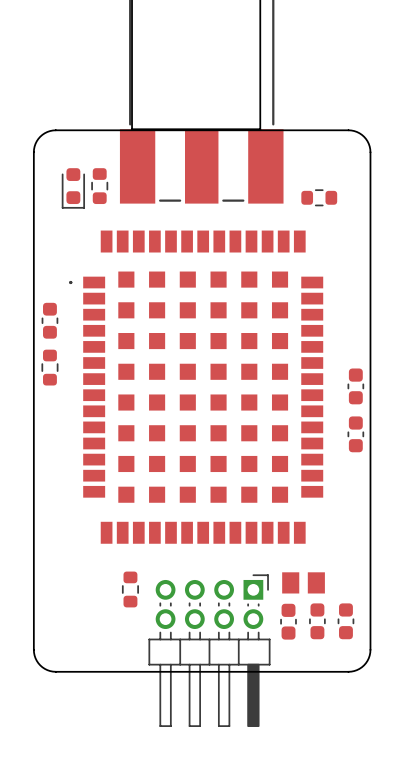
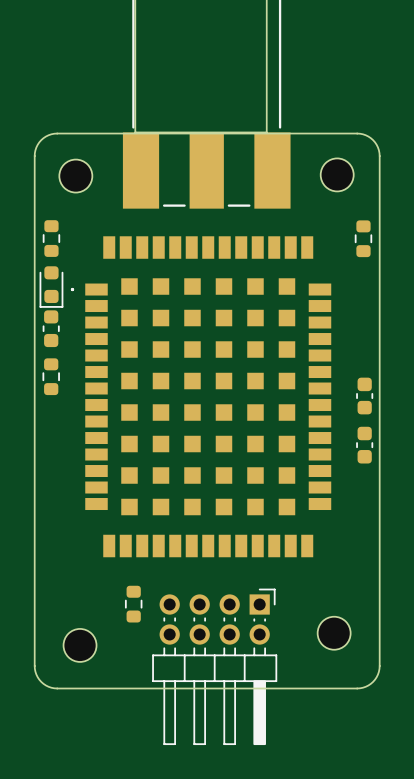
part: none -> (337, 174)
part: none -> (75, 176)
part position: (99, 186) -> (51, 238)
part position: (73, 188) -> (51, 287)
part rotation: 0° (319, 197) -> 90° clockwise (363, 238)
part position: (319, 197) -> (363, 238)
part: (303, 582) -> none
part footprint: [309, 603, 326, 640] -> [317, 616, 351, 650]
part: (288, 621) -> none
part: (345, 621) -> none
part: none -> (80, 645)

